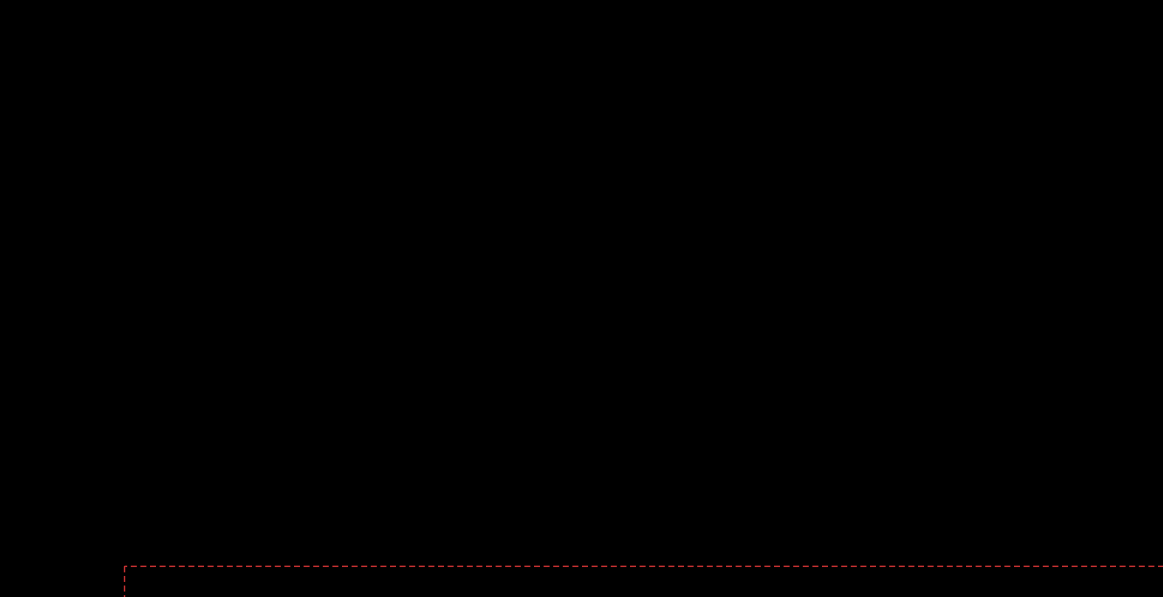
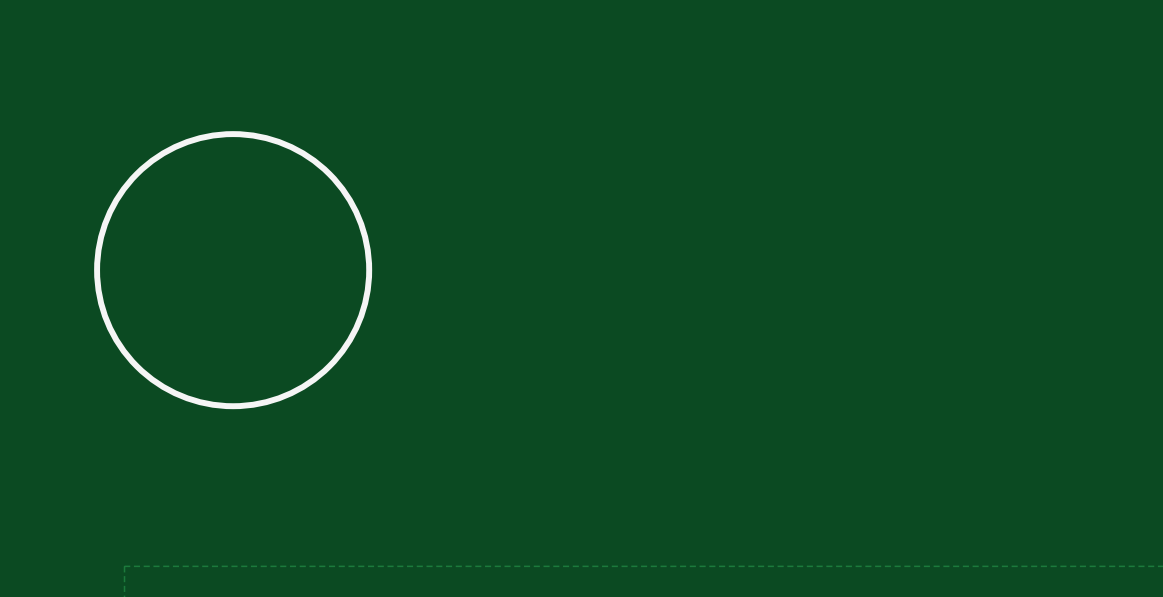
drawing: none -> [94, 131, 373, 410]

